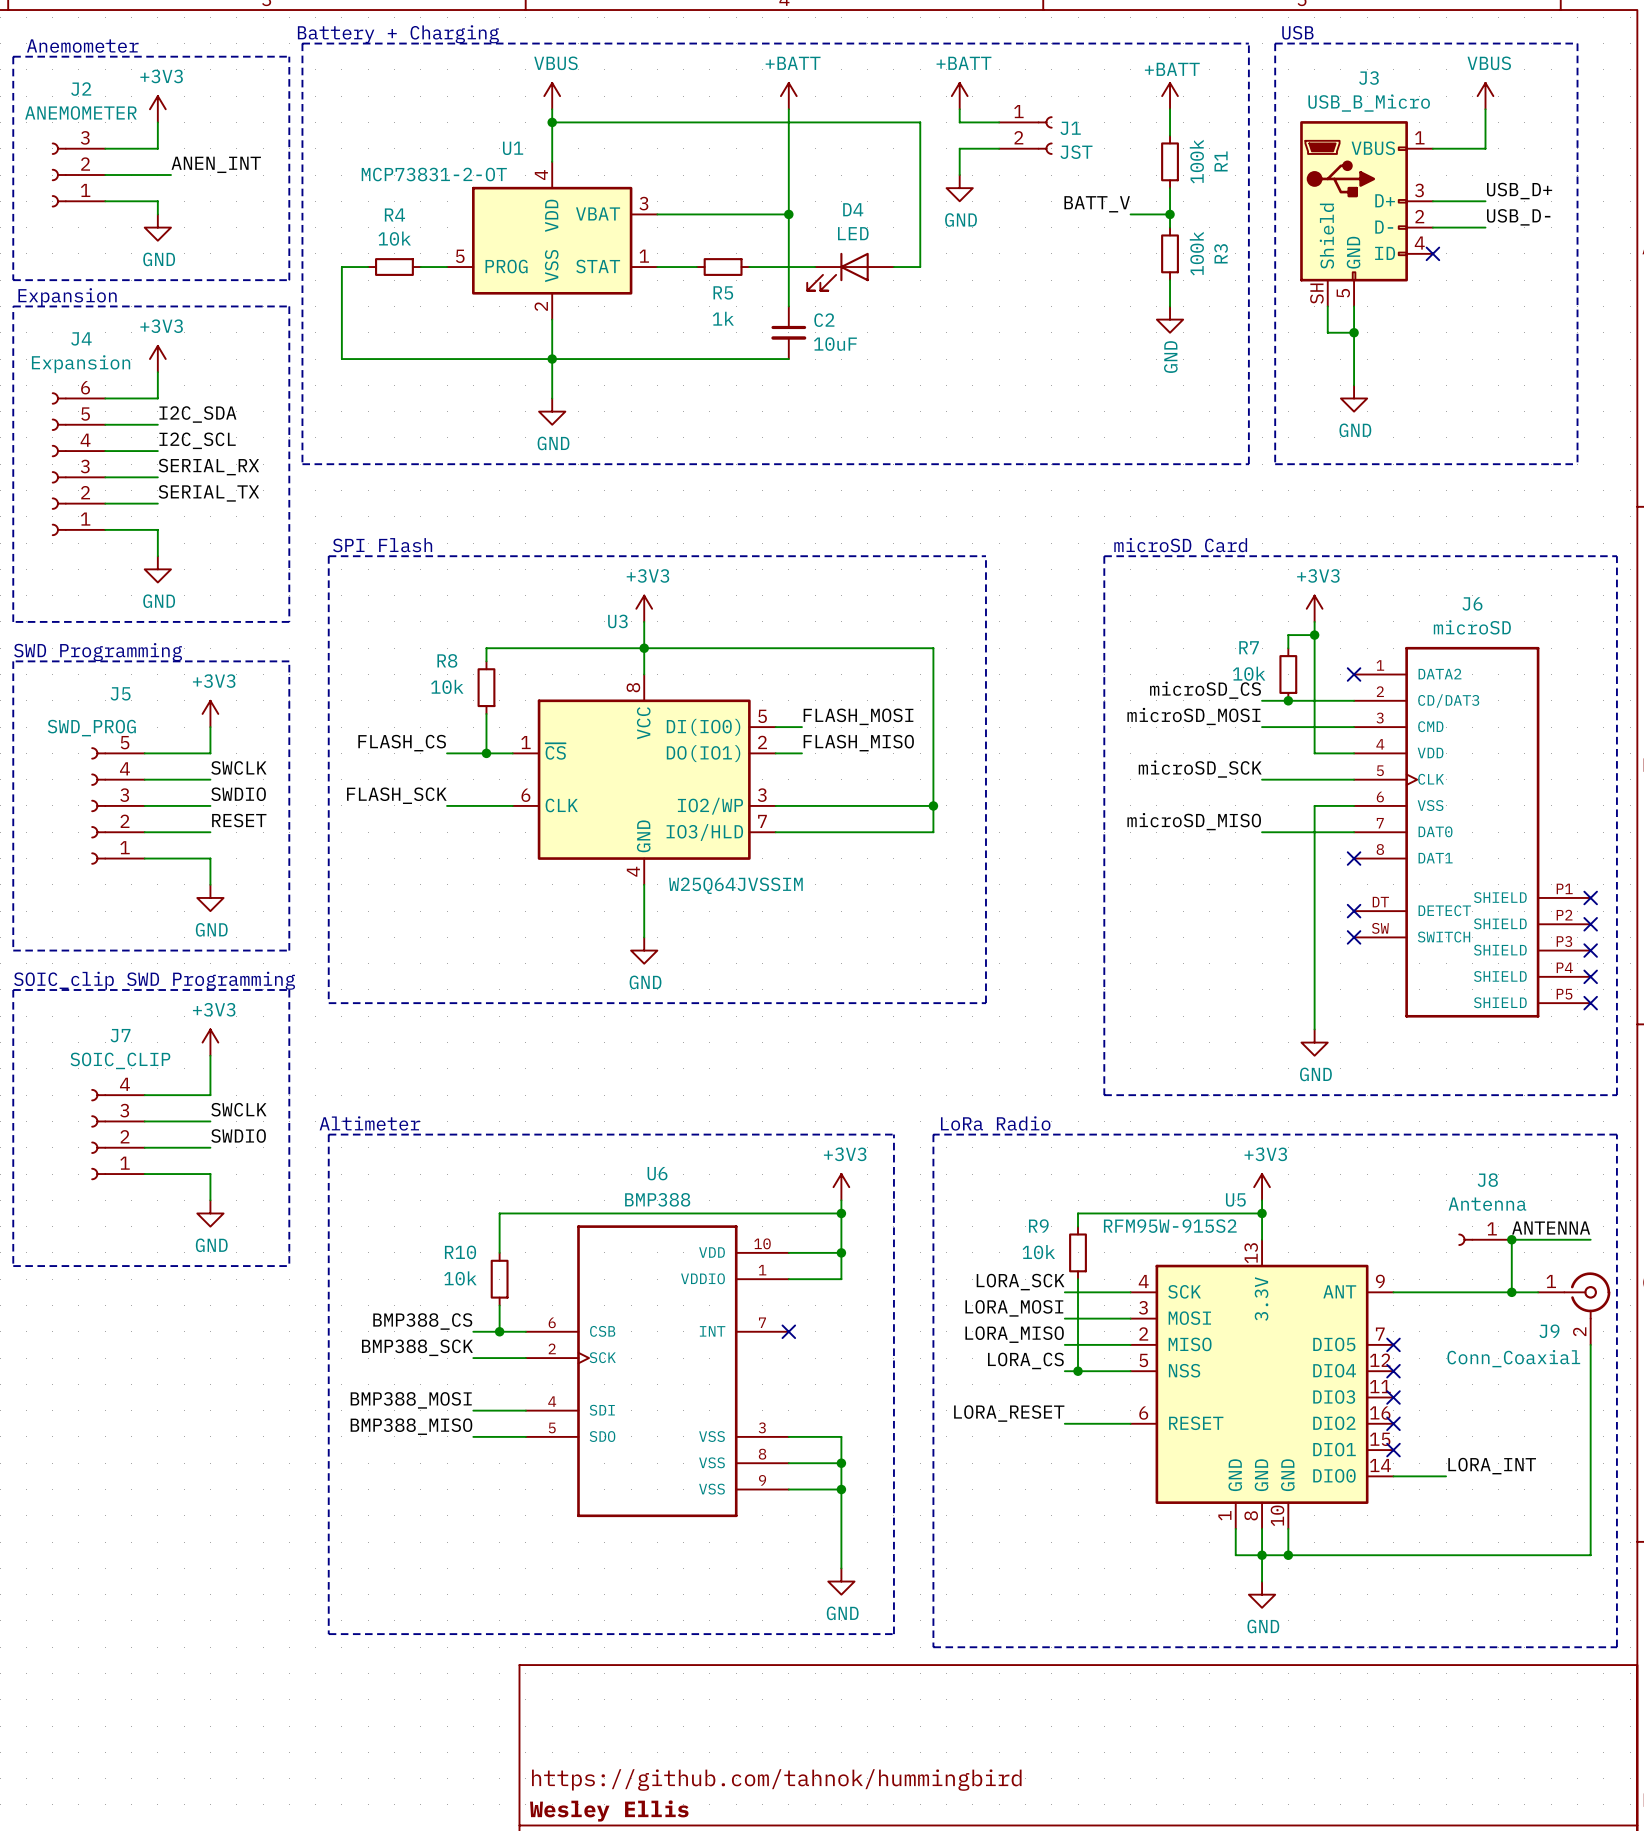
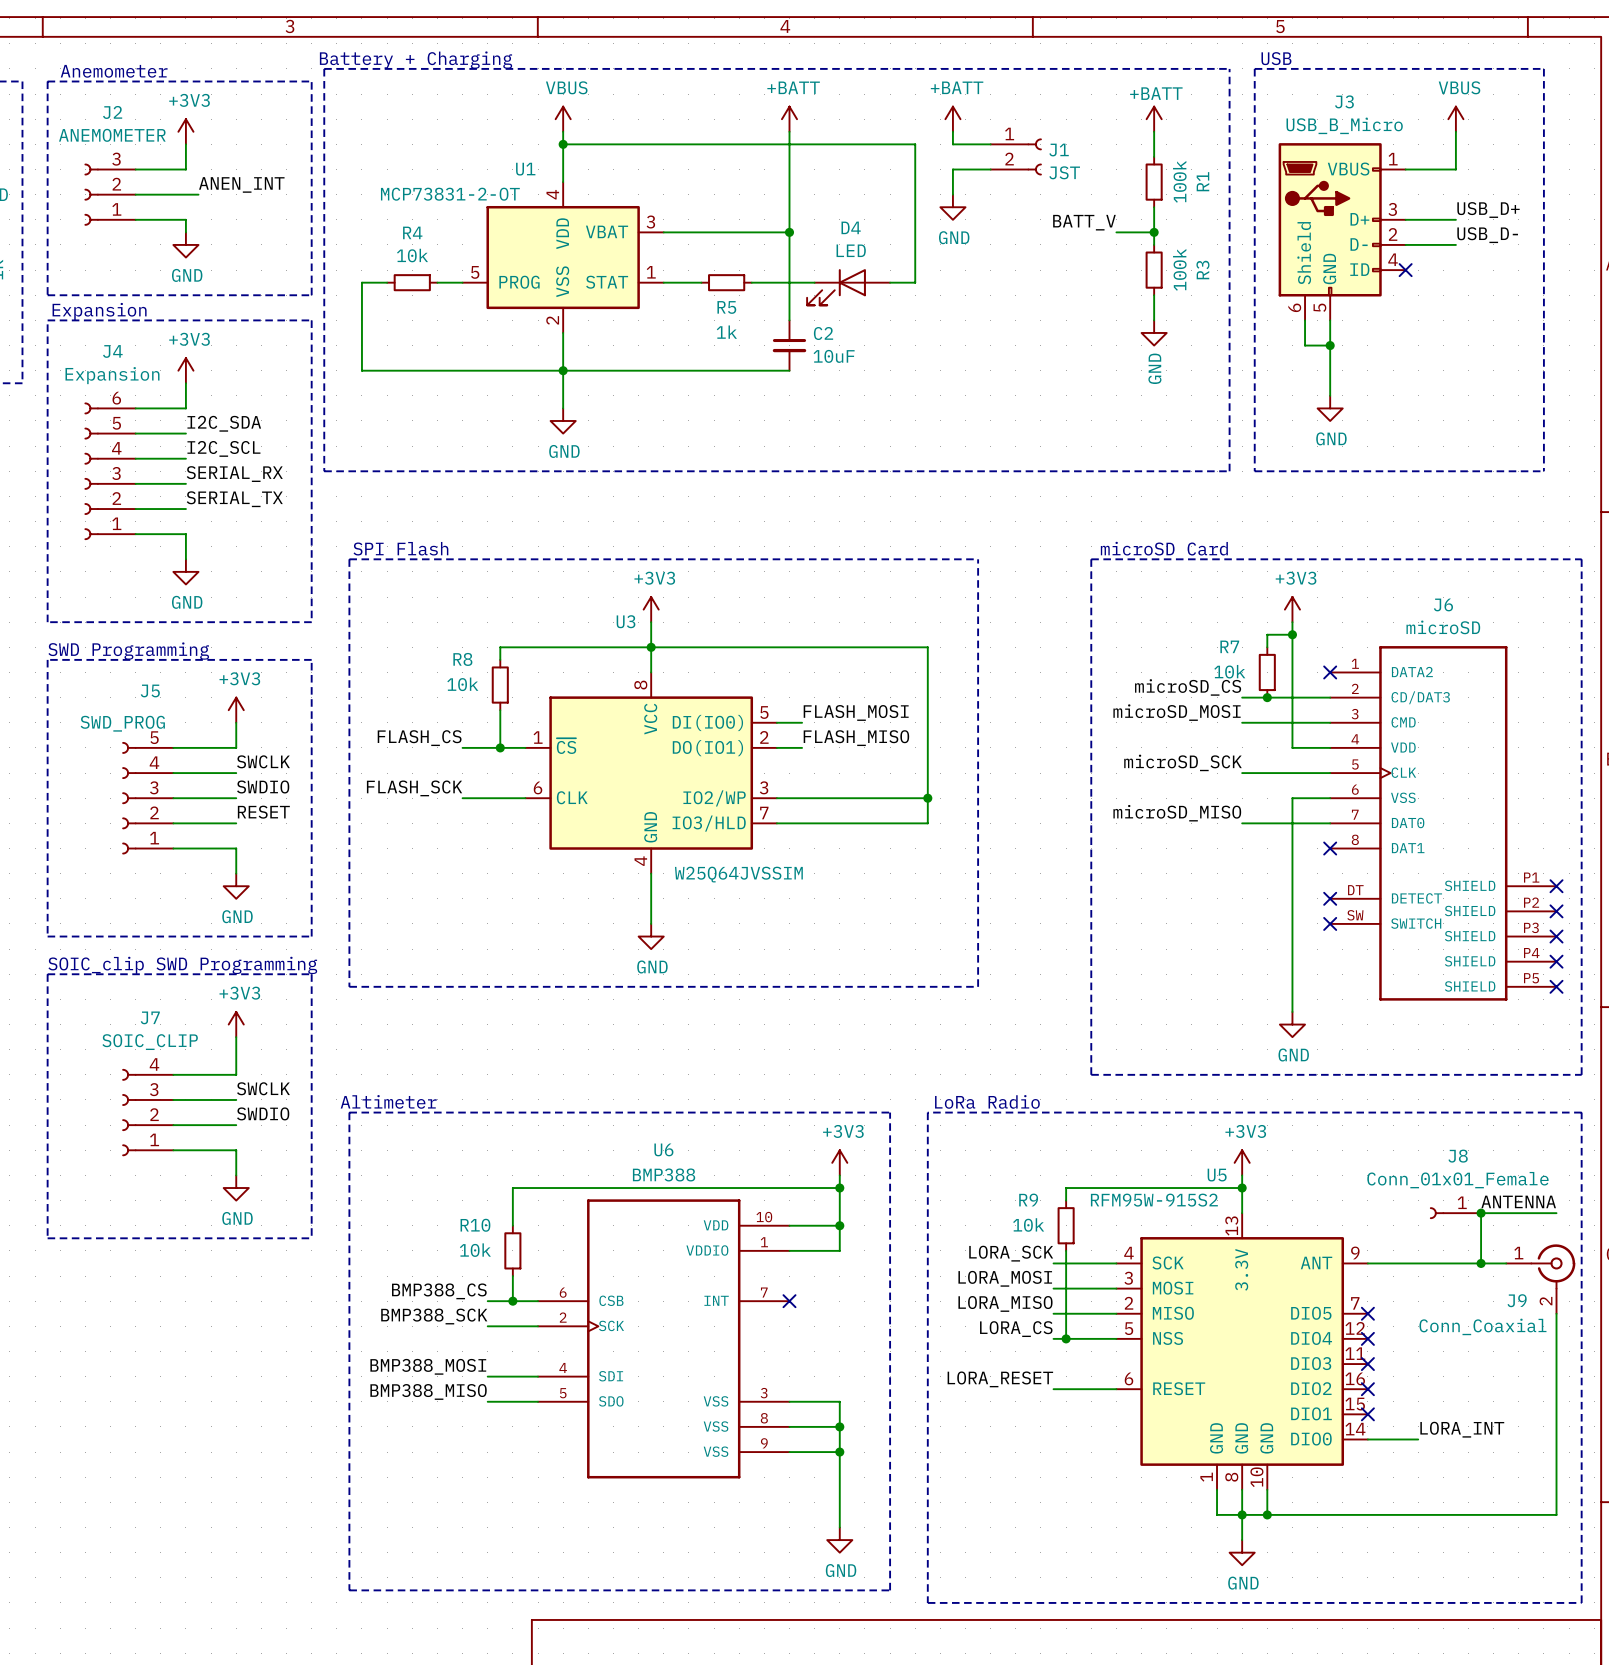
J3 pin number: SH (1316, 293) -> 6 (1294, 307)
J8 value: Antenna (1487, 1204) -> Conn_01x01_Female (1457, 1180)

